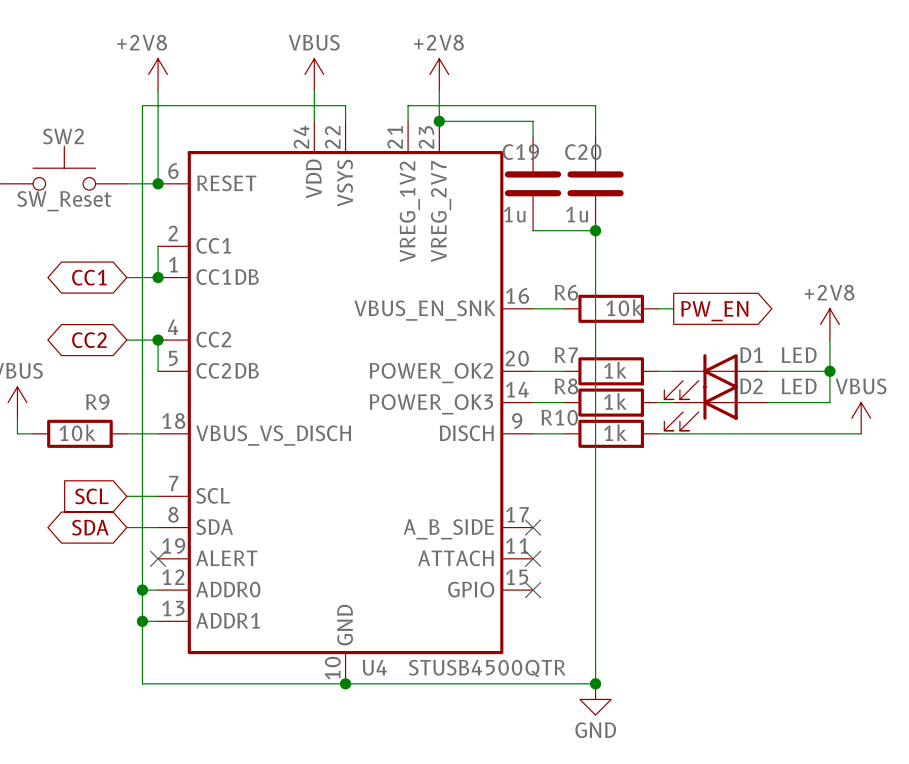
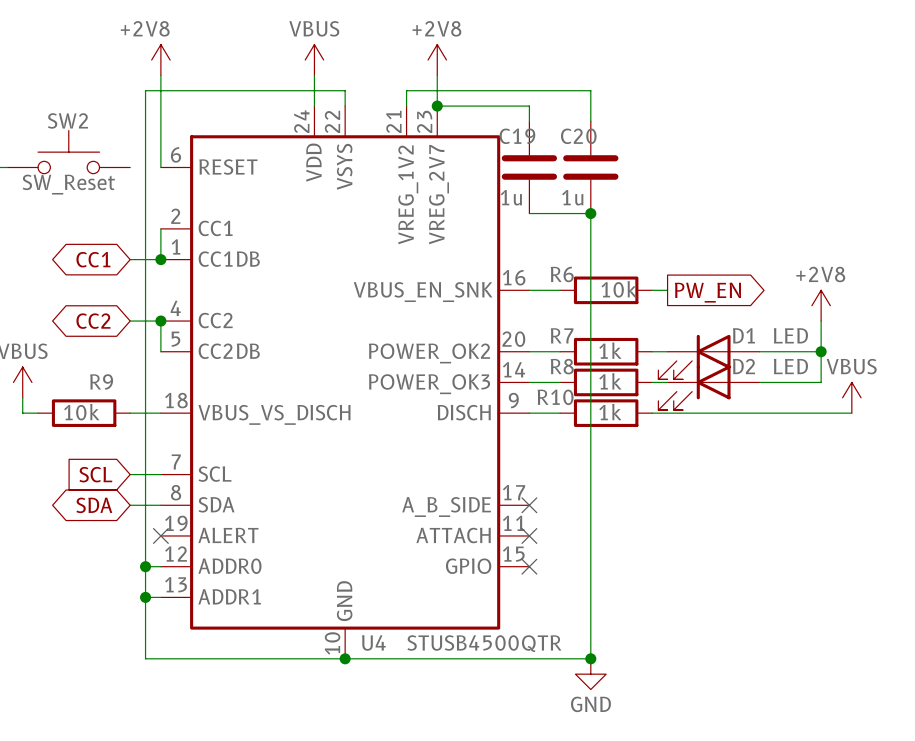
wire: (126, 183) (158, 183) -> none
junction: (158, 183) -> none

